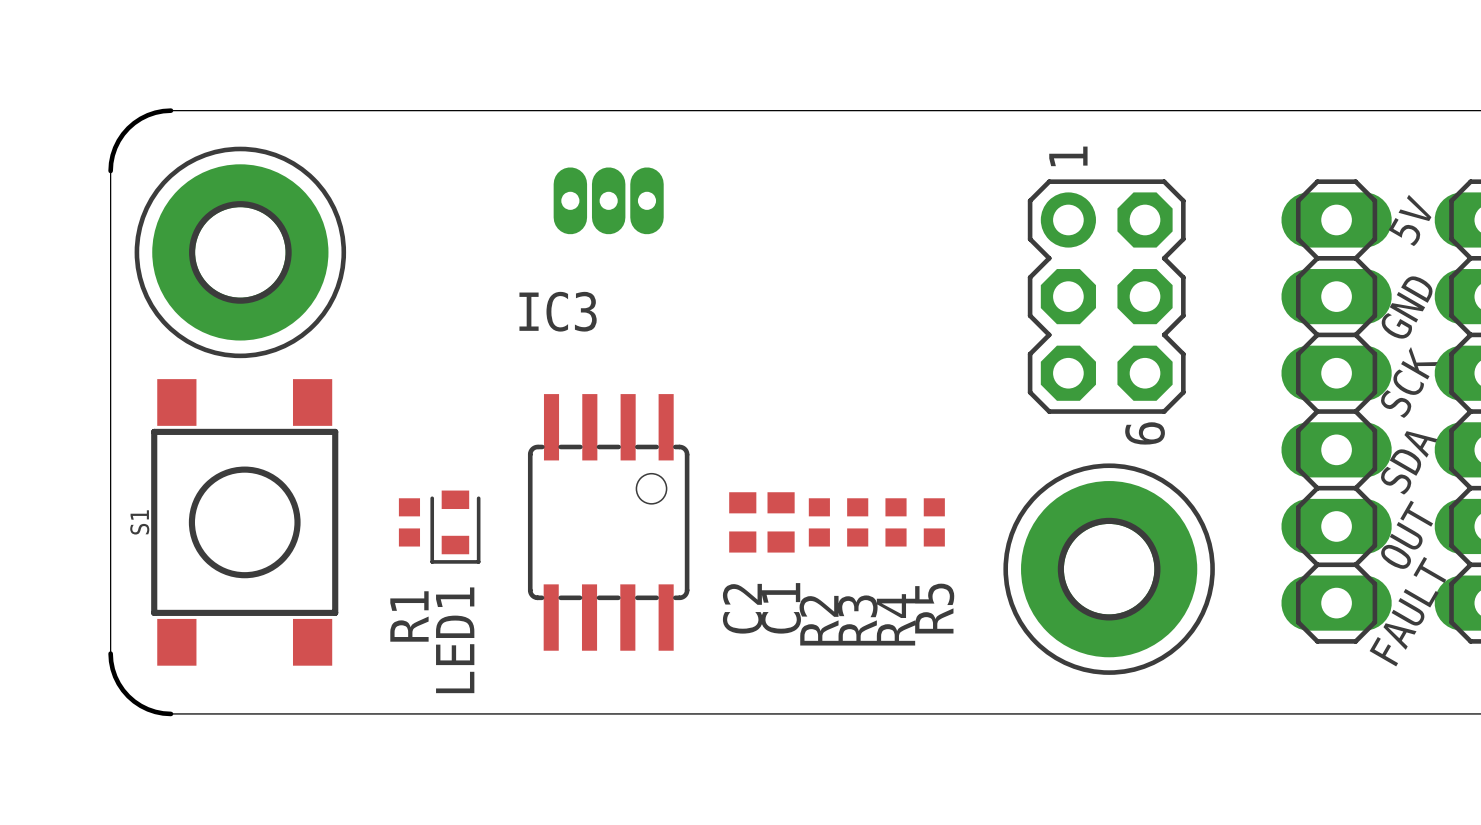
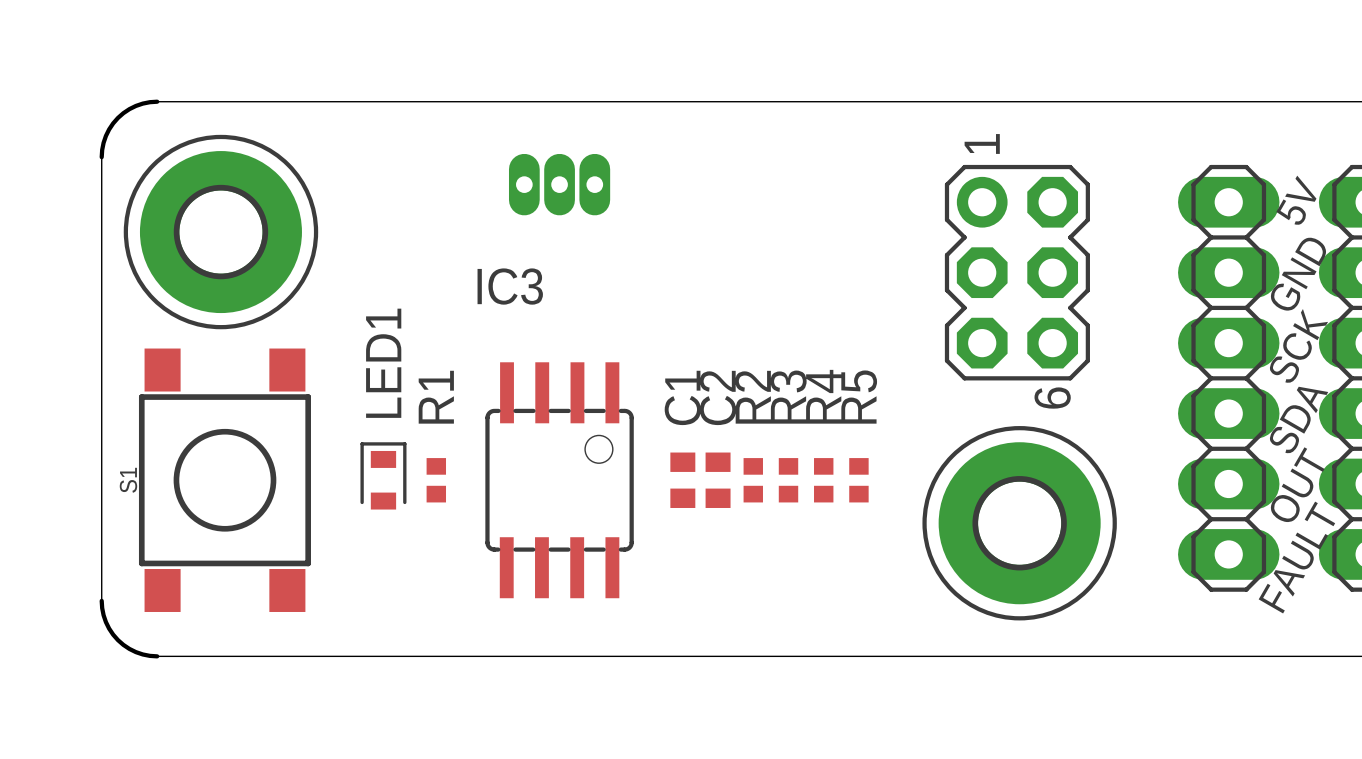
R1 position: (409, 522) -> (436, 480)
LED1 rotation: 0° (455, 527) -> 180° (383, 475)
C2 name: C2 (742, 608) -> C1 (682, 397)
C1 name: C1 (781, 608) -> C2 (718, 397)
R5 name position: R5 (934, 608) -> R5 (859, 397)
R1 name position: R1 (409, 616) -> R1 (436, 397)
R4 name position: R4 (896, 619) -> R4 (823, 396)
R2 name position: R2 (819, 620) -> R2 (753, 397)
R3 name position: R3 (857, 620) -> R3 (788, 397)

